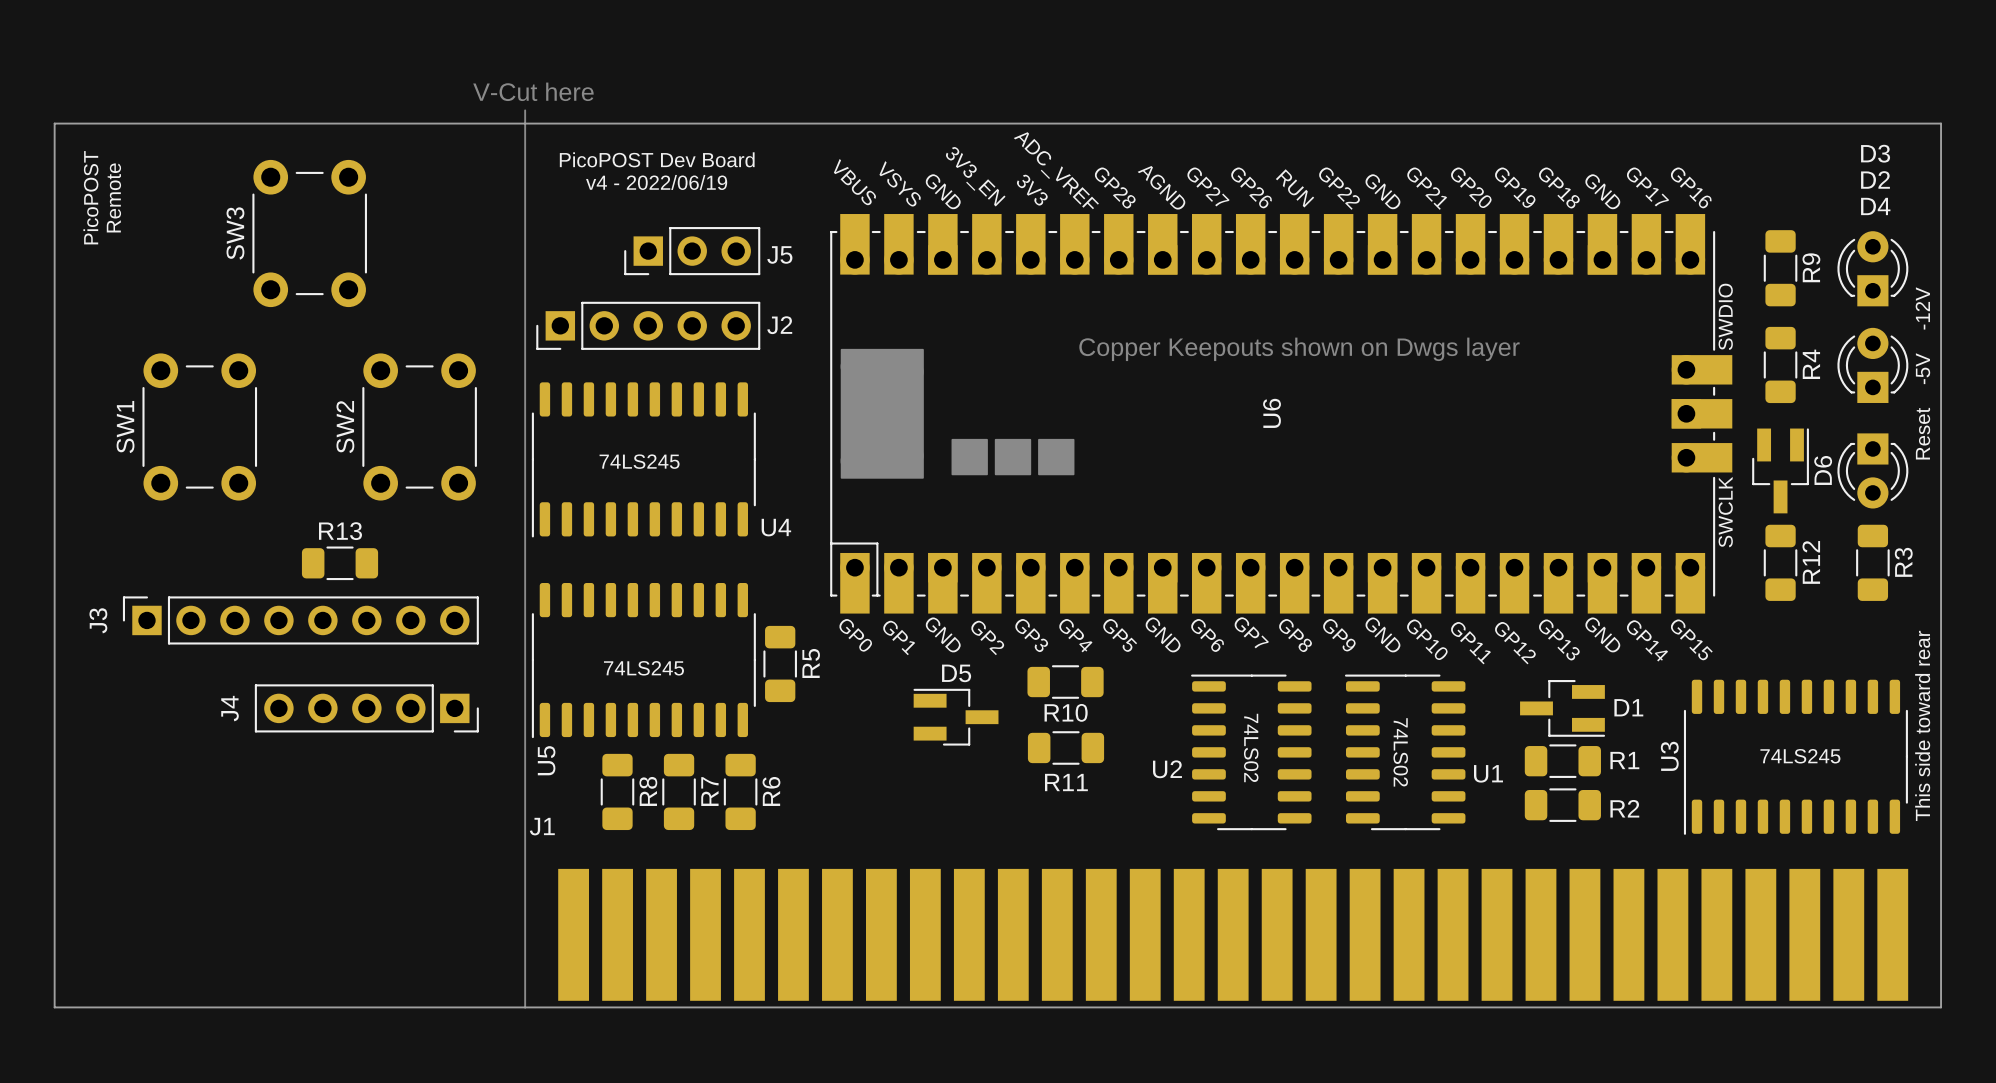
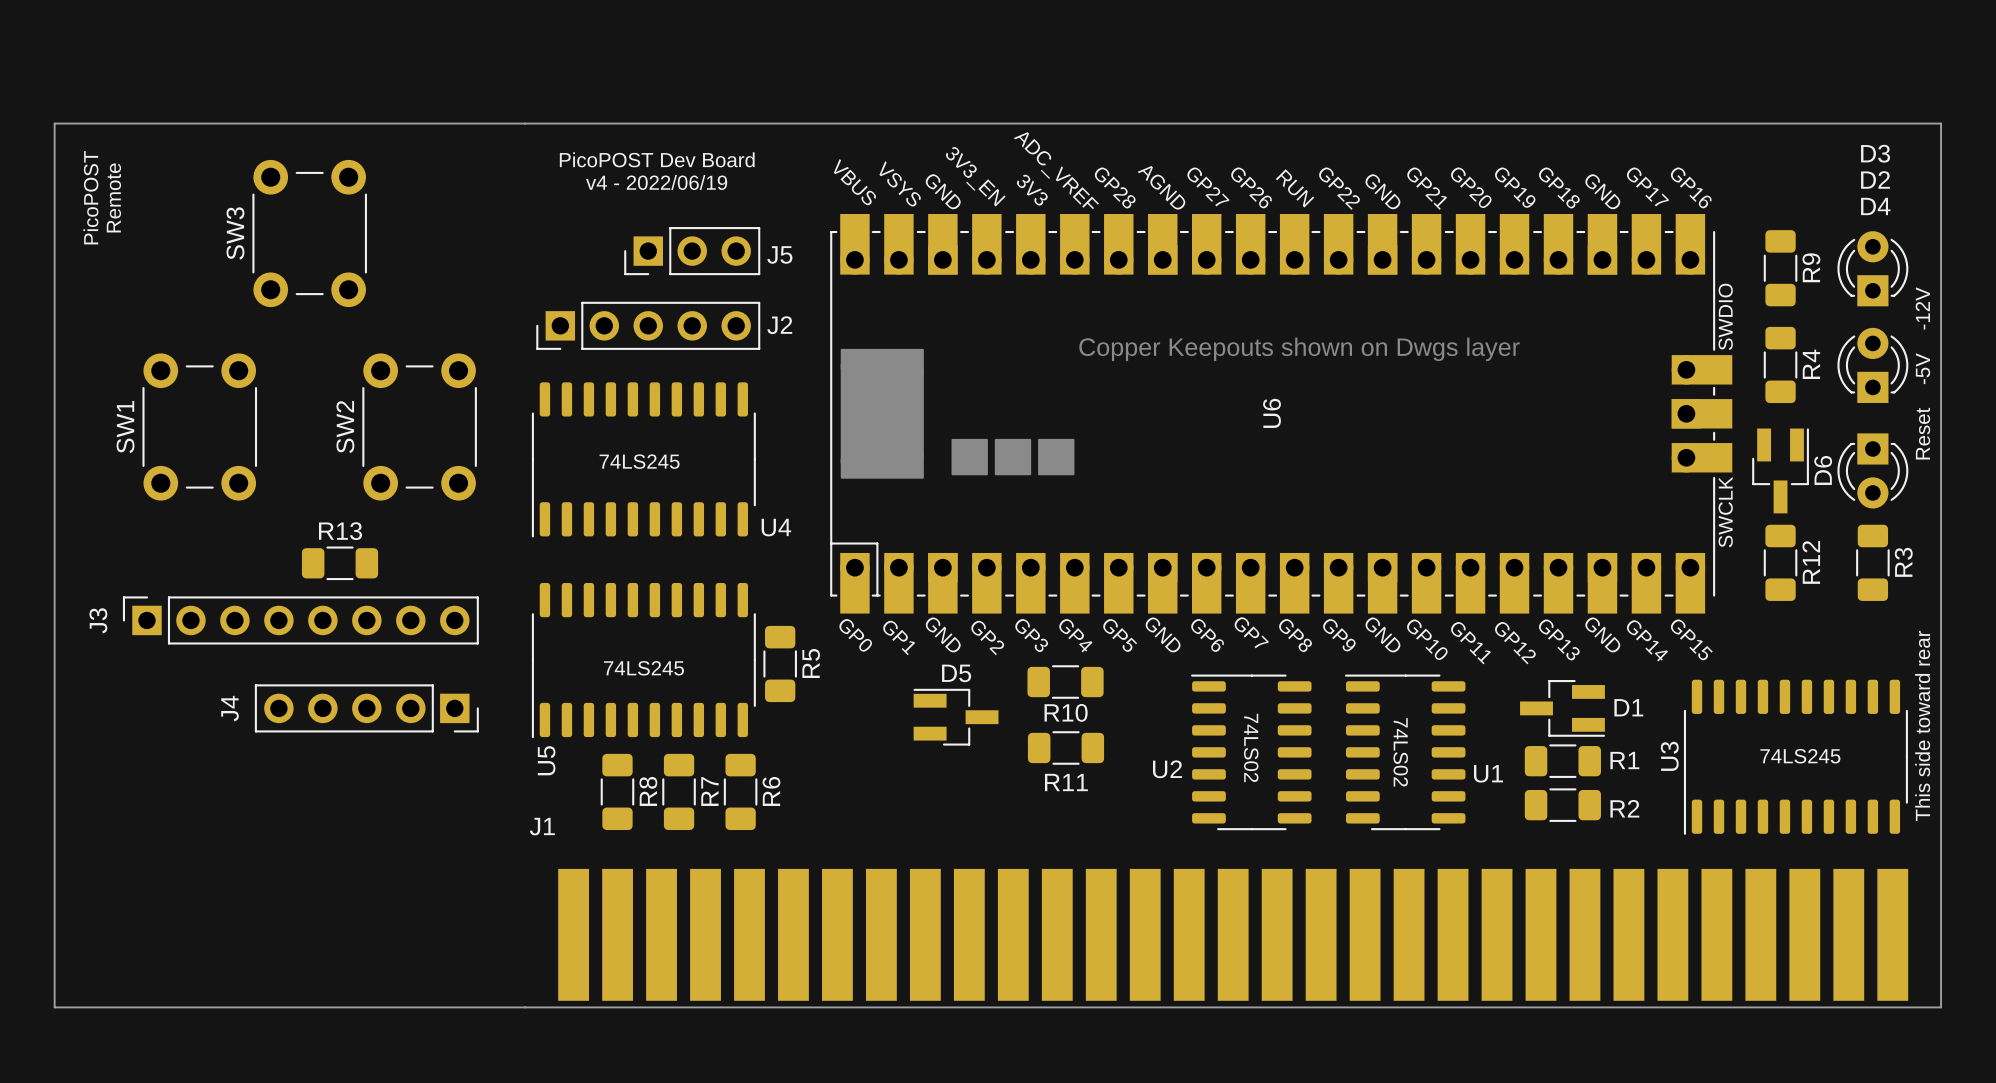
text: V-Cut here (533, 91) -> none
line: (525, 110) (525, 1007) -> none

